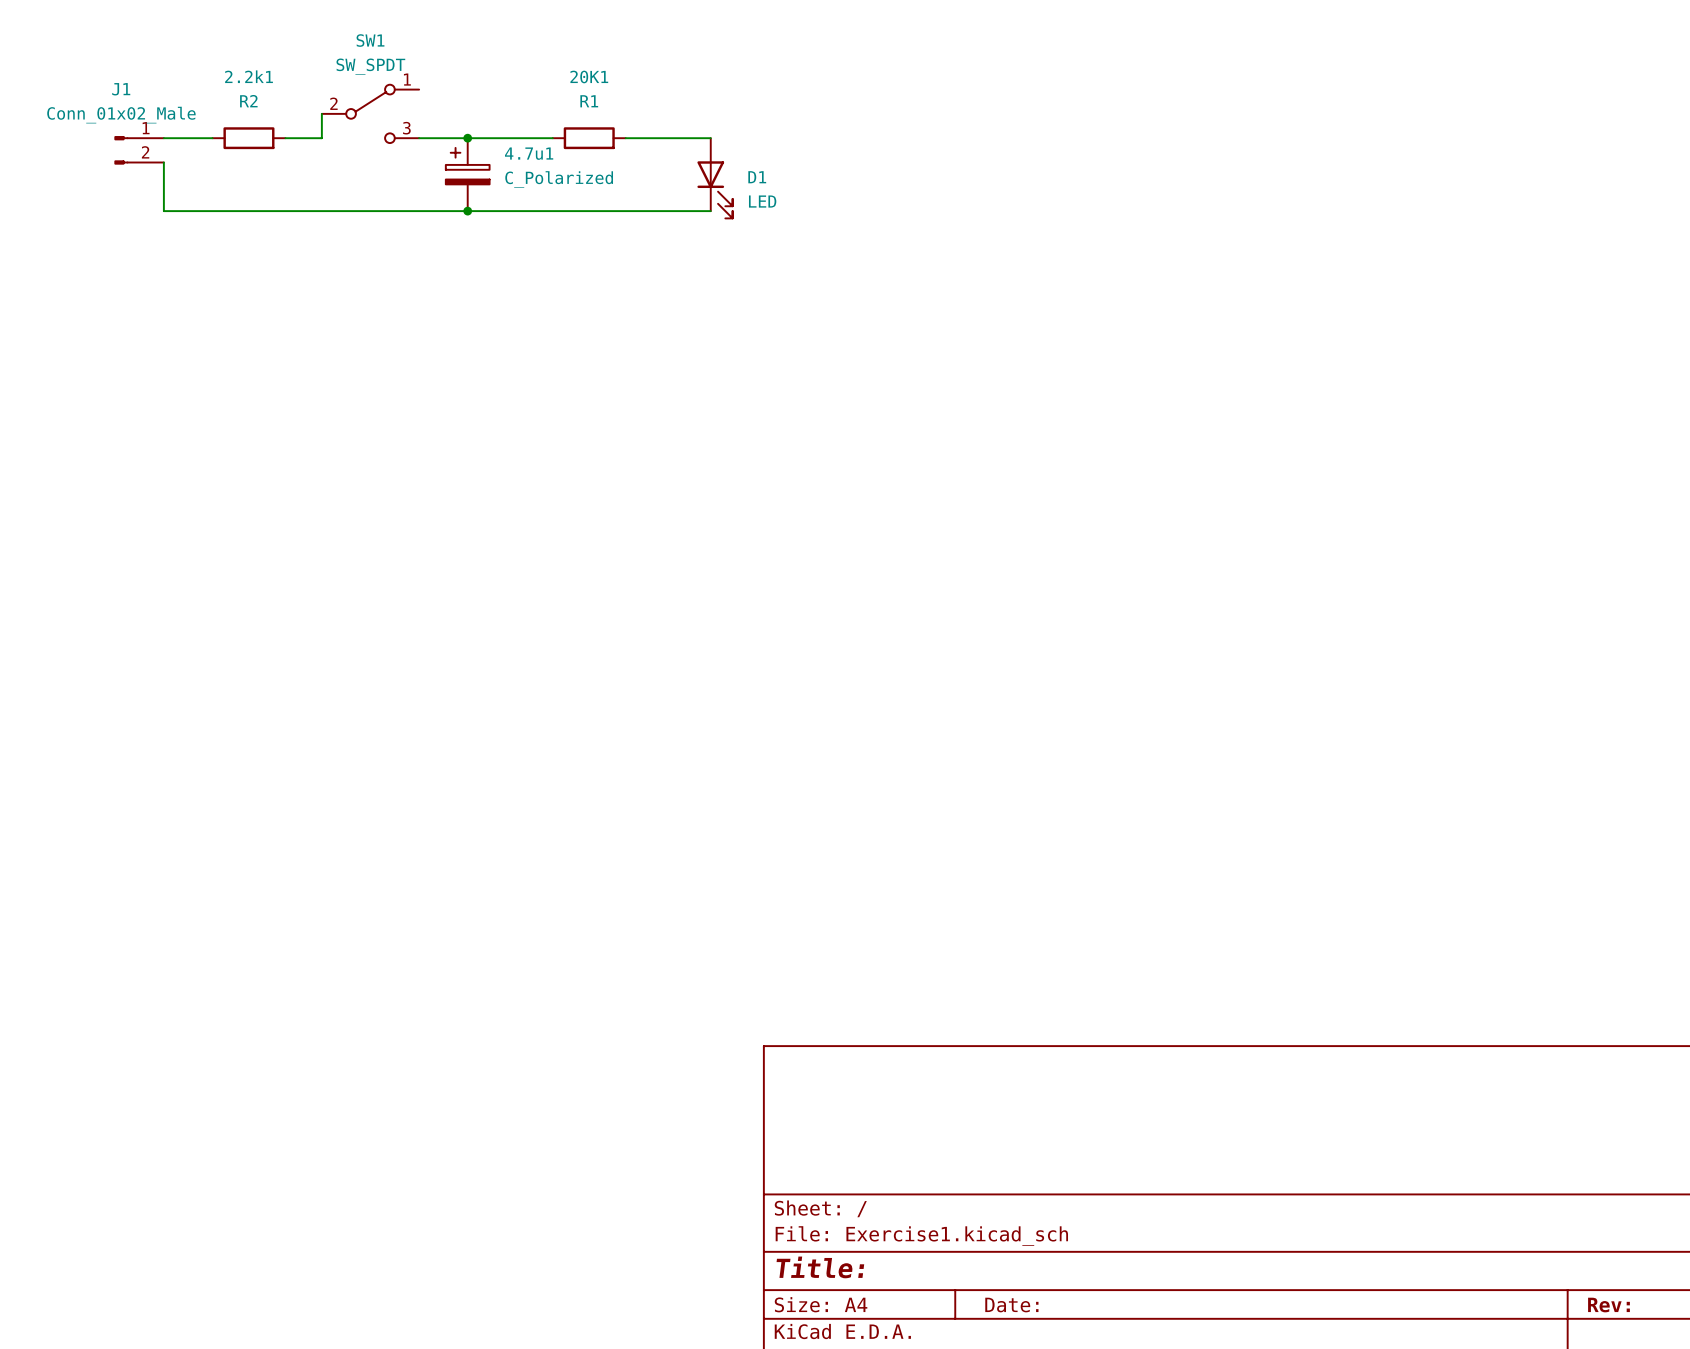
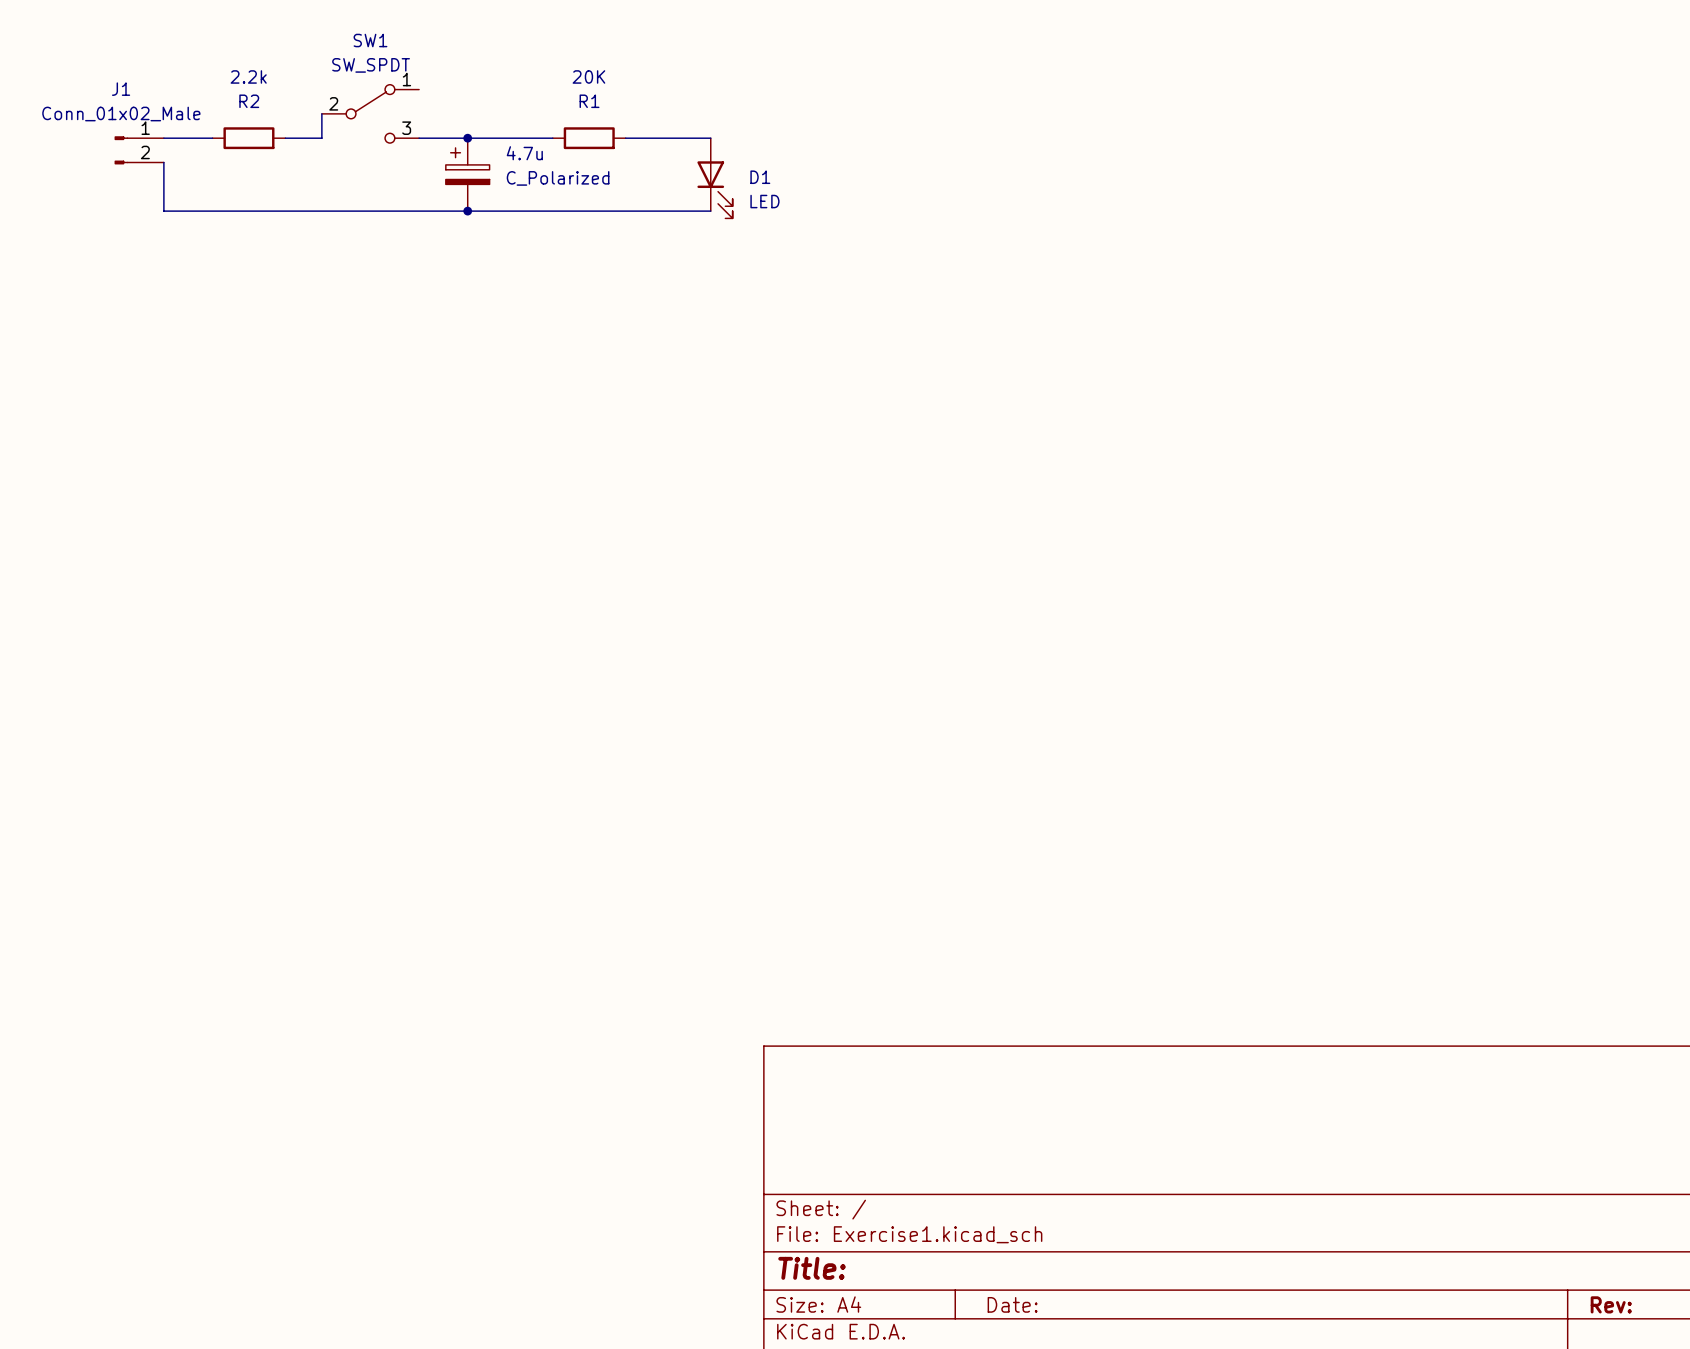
2.2k1 name: 2.2k1 (249, 76) -> 2.2k (248, 76)
20K1 name: 20K1 (589, 76) -> 20K (588, 76)
4.7u1 name: 4.7u1 (529, 153) -> 4.7u (524, 153)

